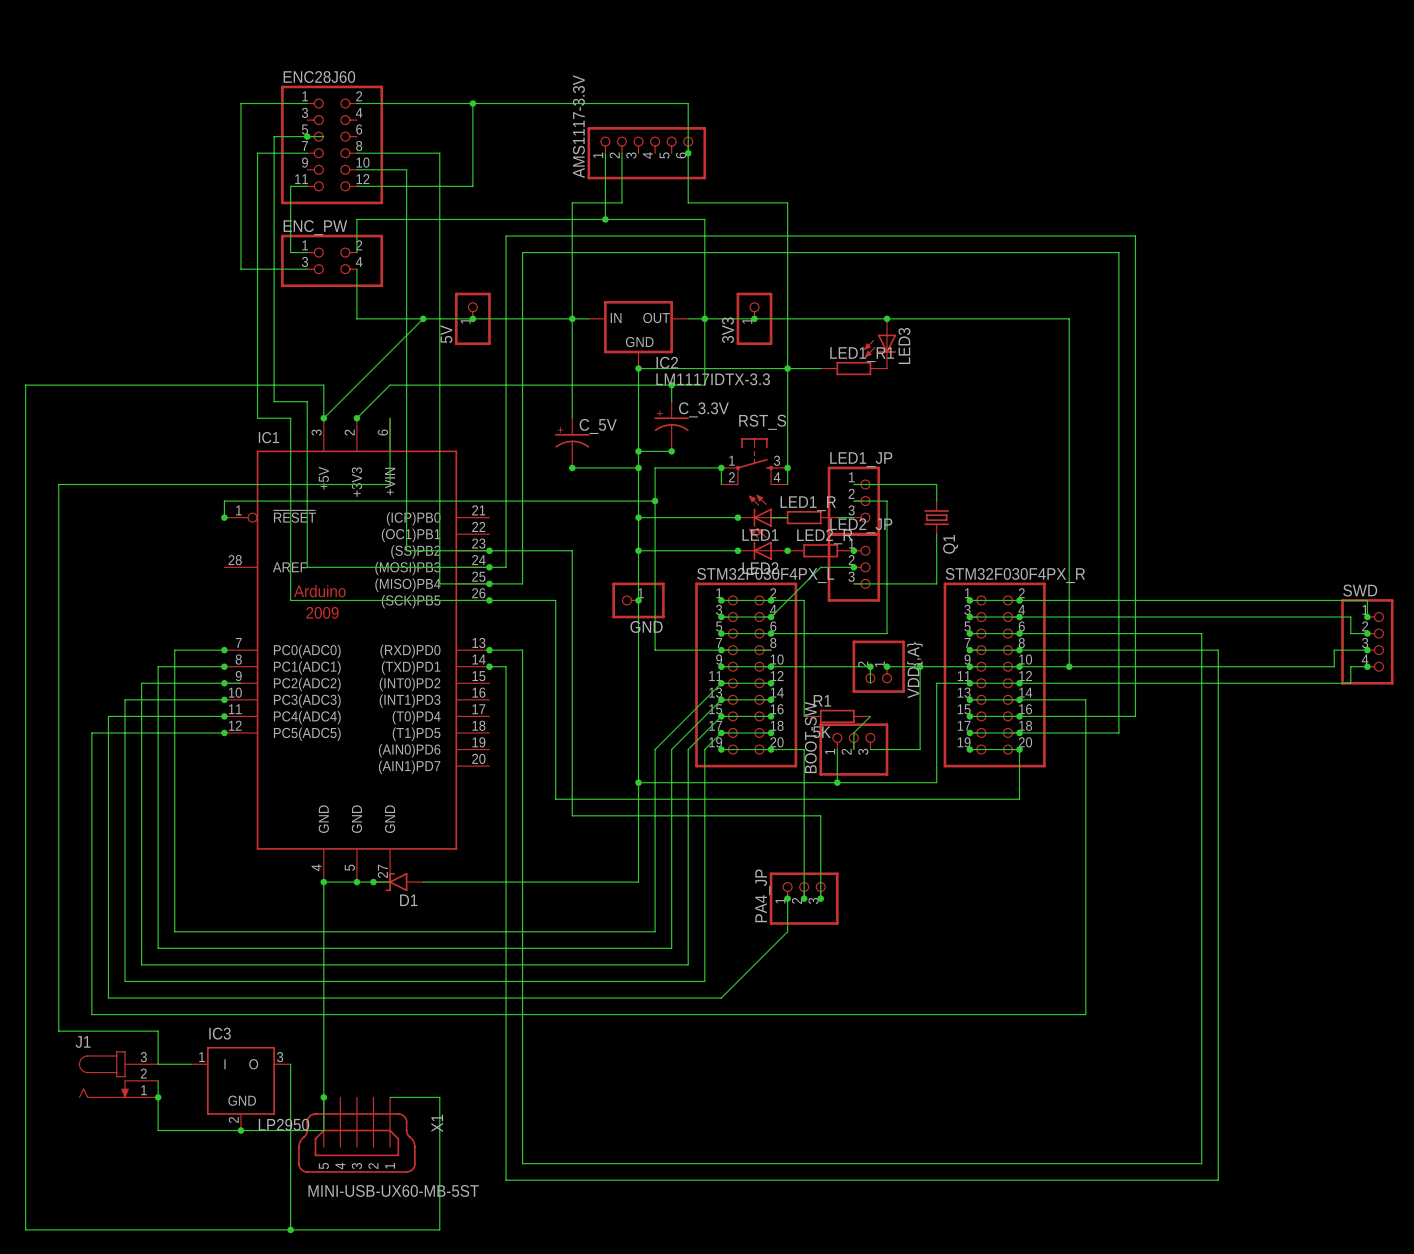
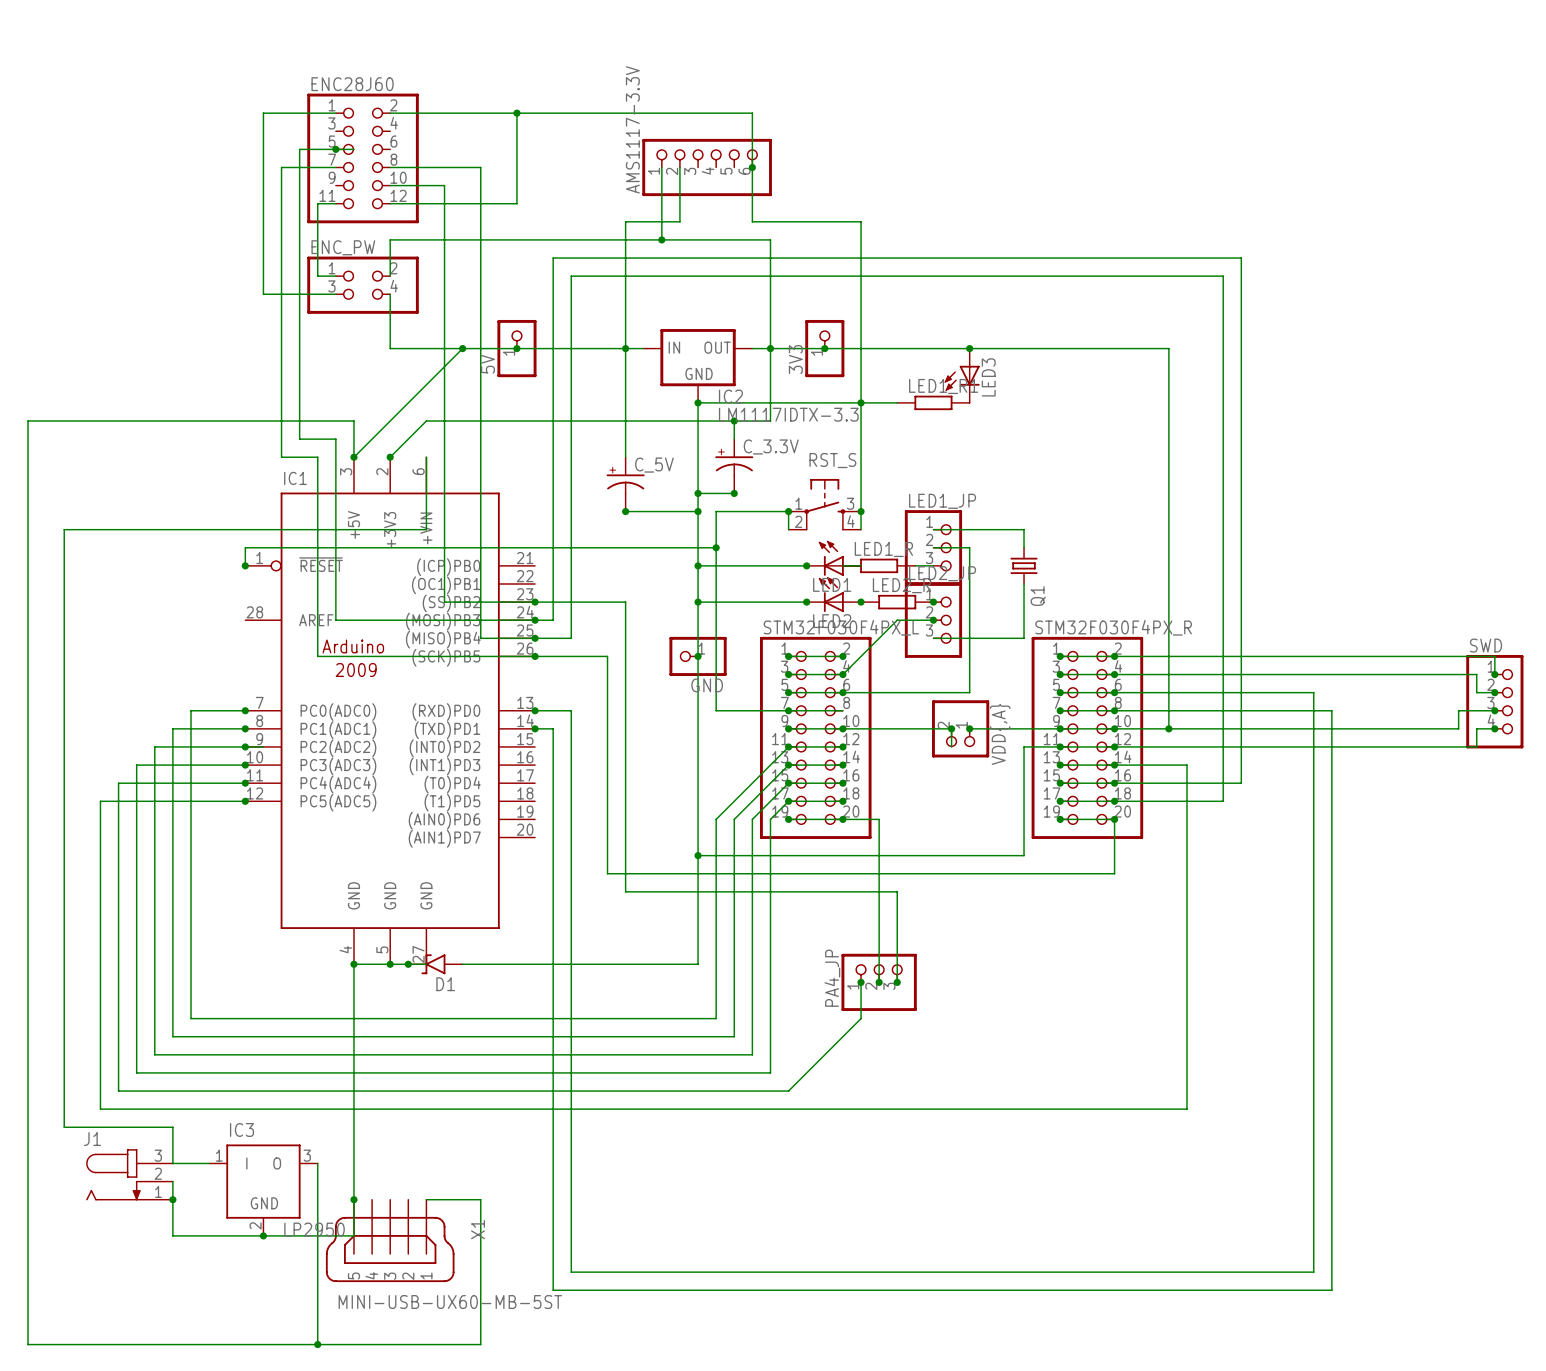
wire: (771, 600) (804, 600) (804, 716) -> none
wire: (920, 666) (920, 749) (870, 749) -> none
junction: (920, 666) -> none
R1: 5K (837, 716) -> none
wire: (870, 716) (853, 732) (853, 749) -> none
wire: (837, 749) (837, 782) -> none
BOOT-SW: (853, 749) -> none
junction: (837, 782) -> none

